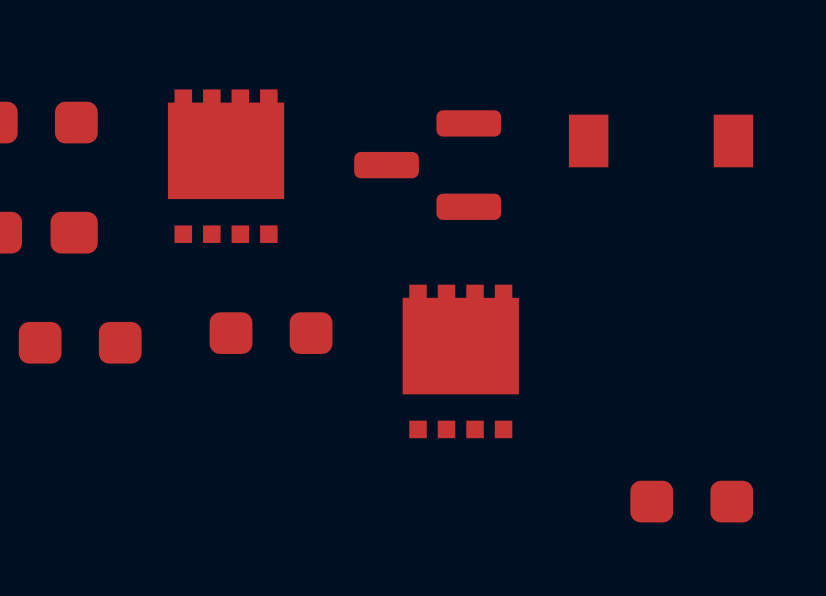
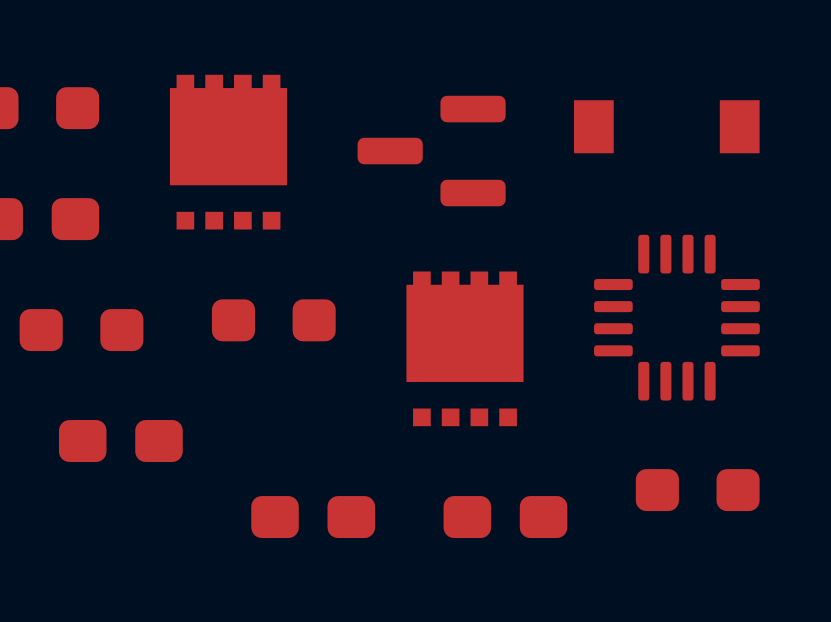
part: none -> (676, 317)
part: none -> (120, 441)
part: none -> (313, 517)
part: none -> (505, 517)

